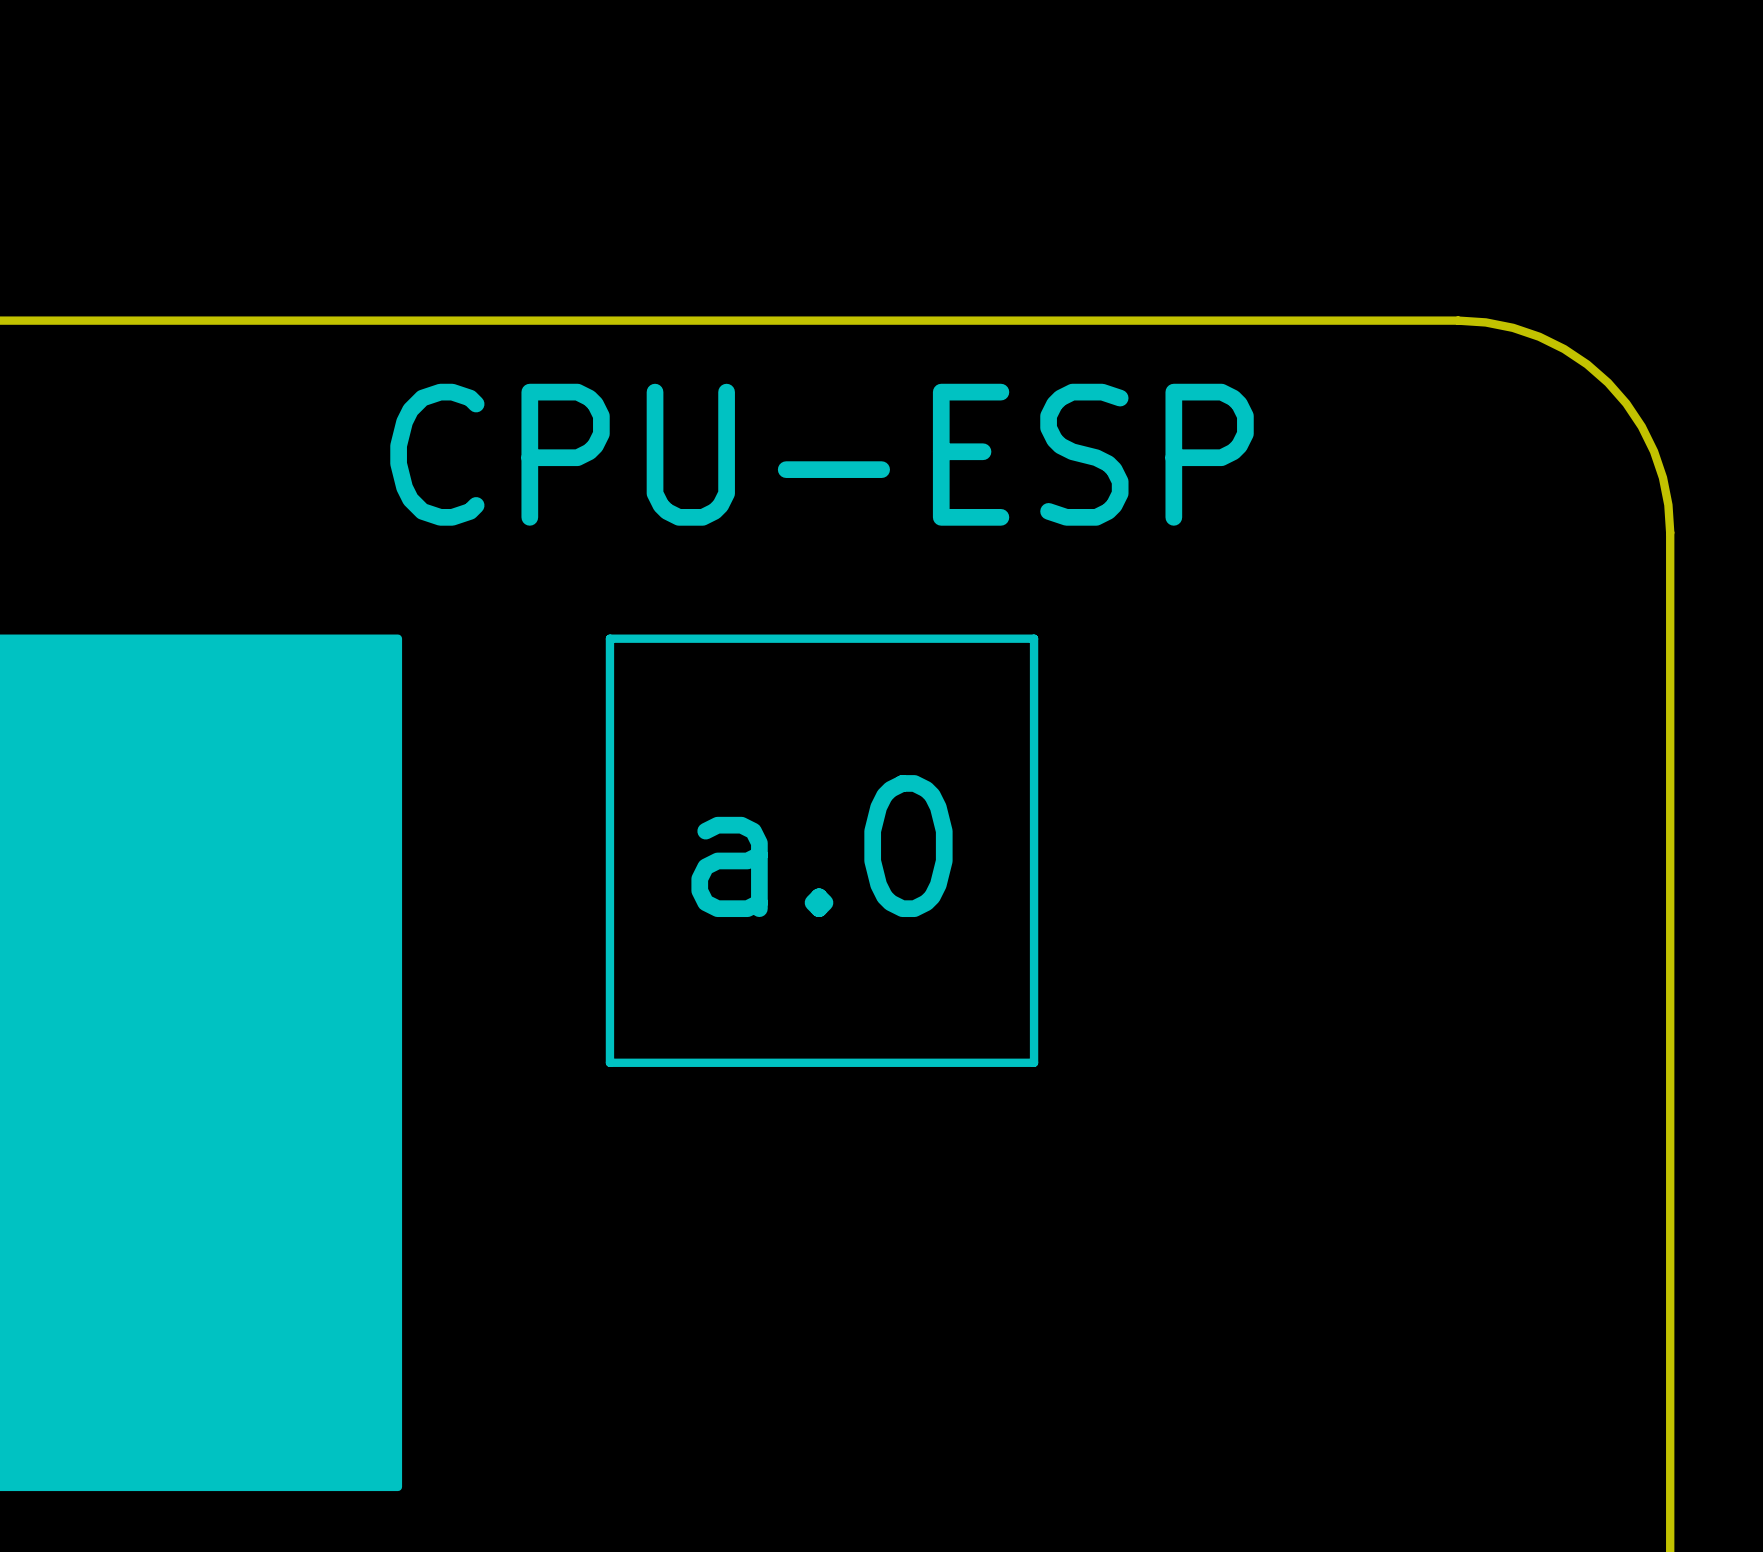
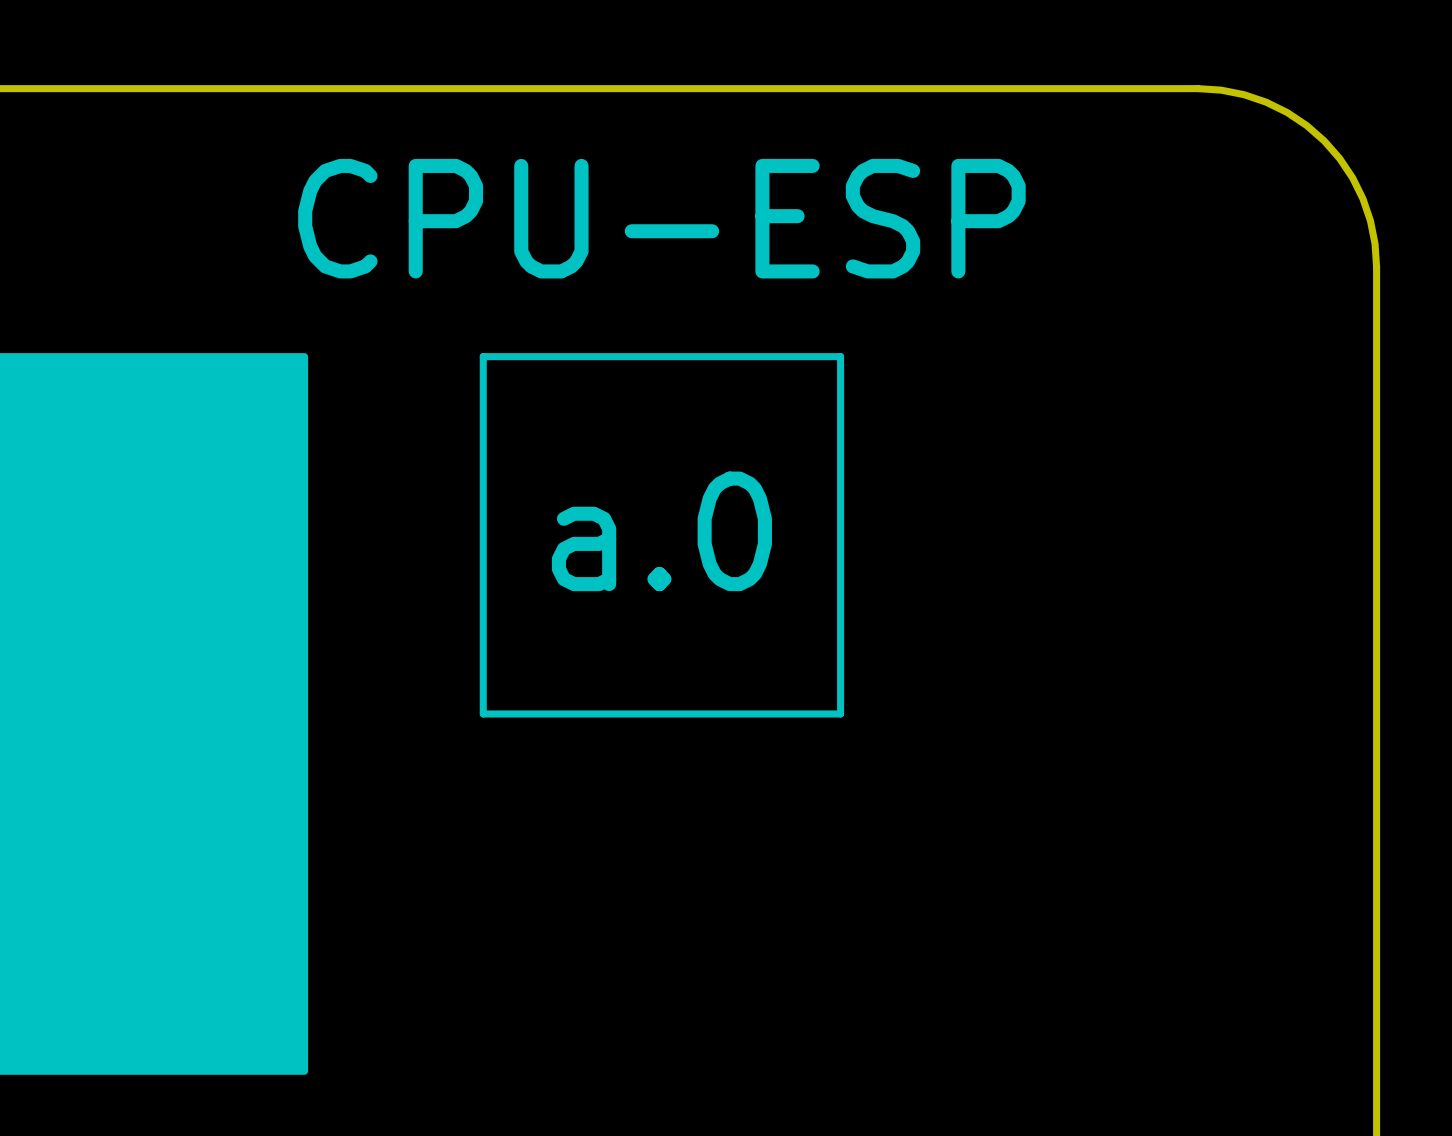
text position: CPU-ESP (822, 454) -> CPU-ESP (661, 218)

